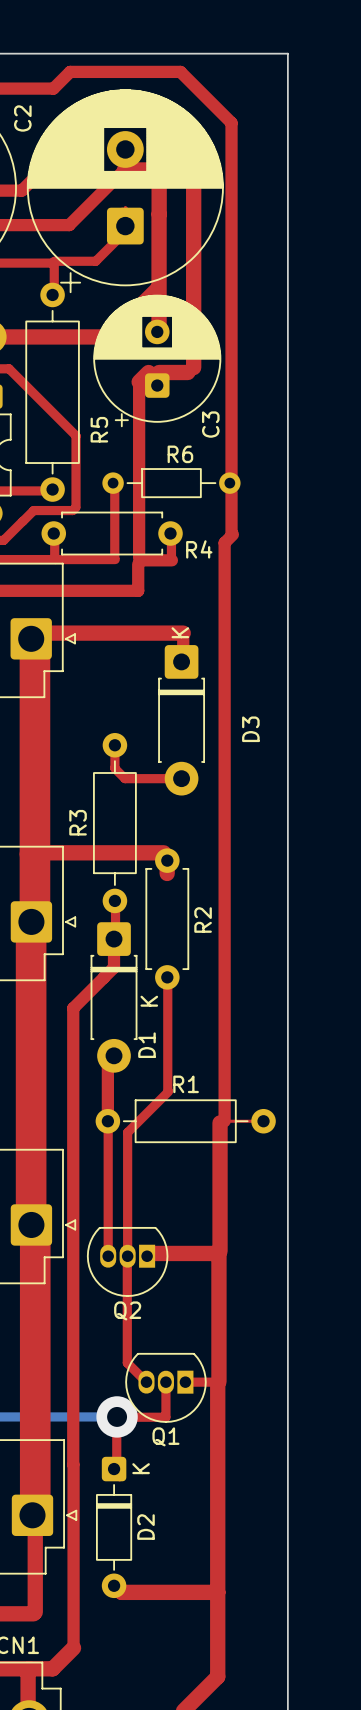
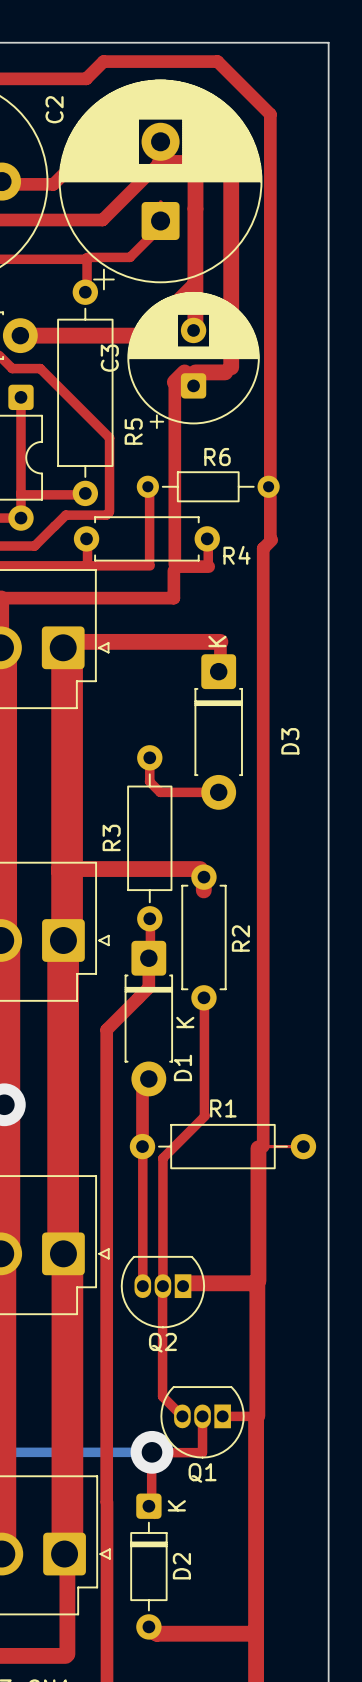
C3 name position: C3 (210, 424) -> C3 (109, 358)

